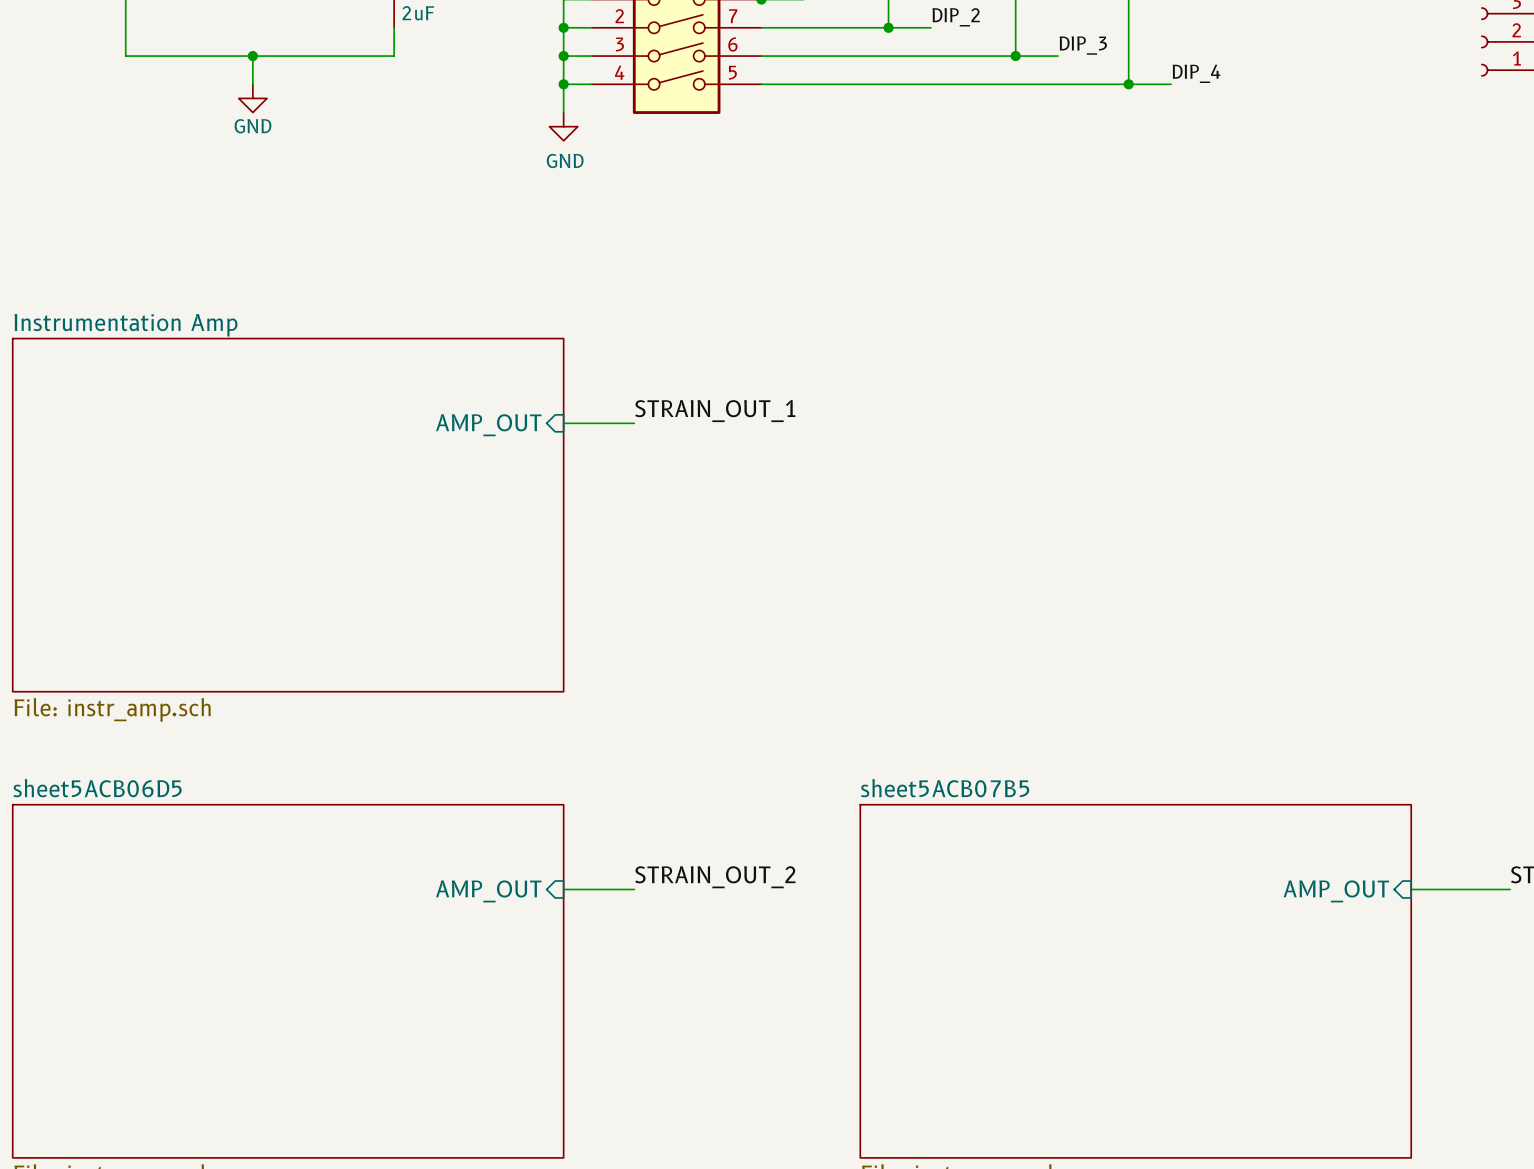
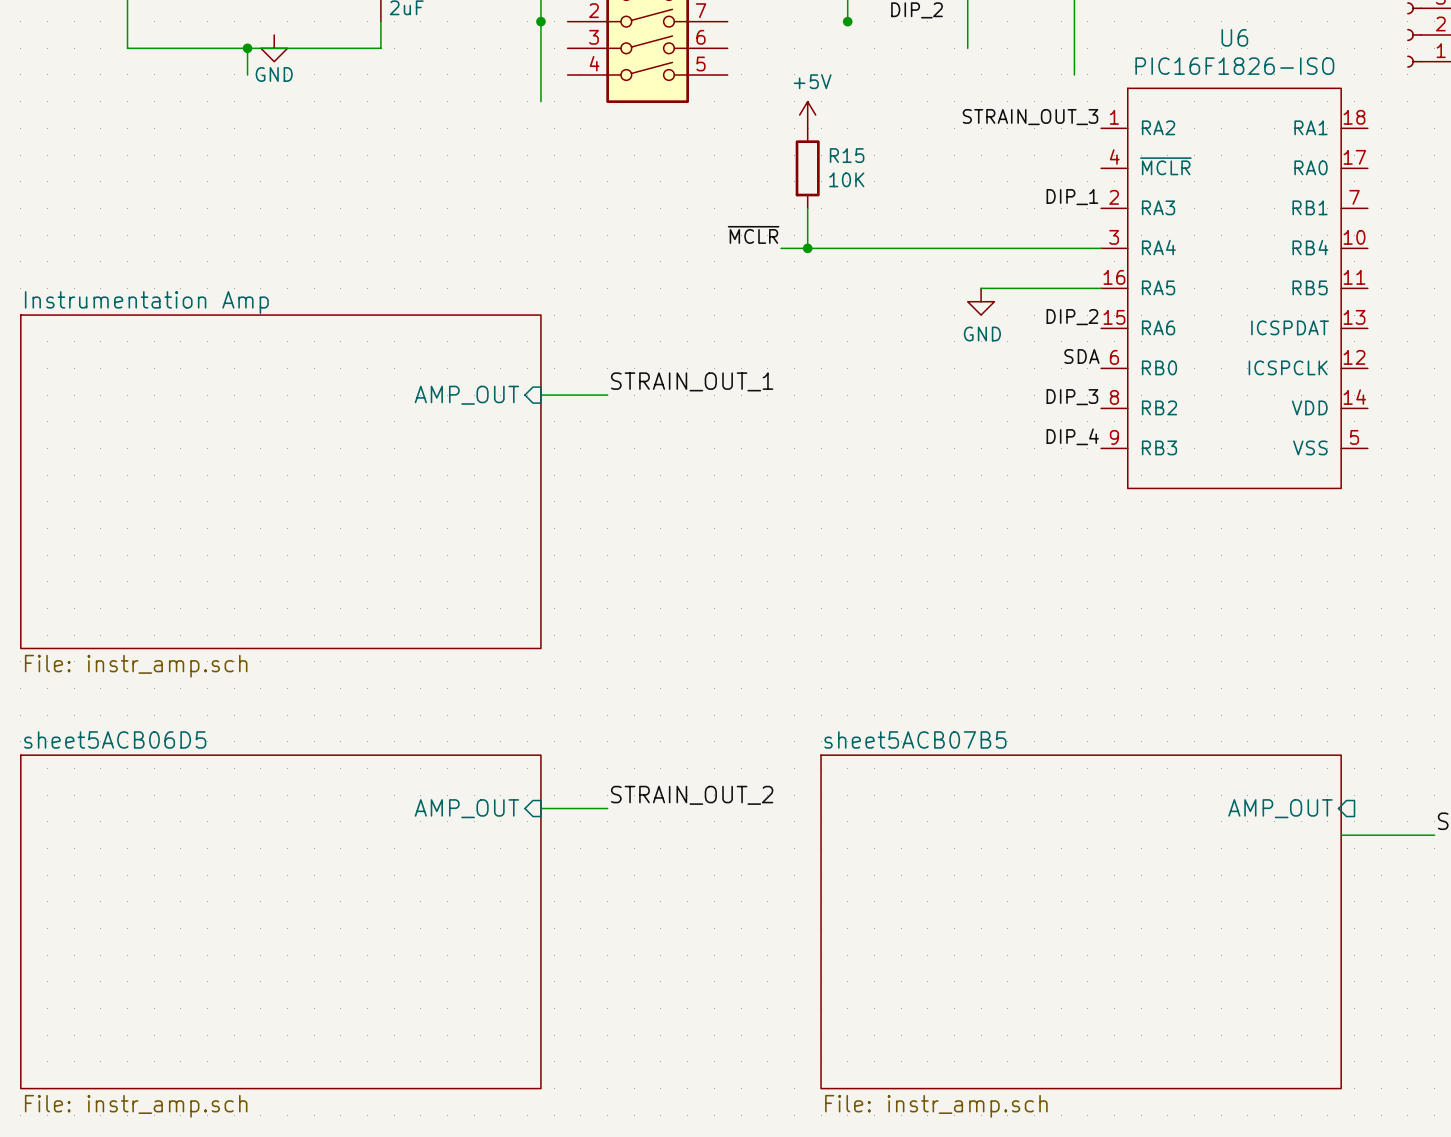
wire: (563, 27) (591, 27) -> none
wire: (761, 27) (930, 27) -> none
label: DIP_3 (1083, 45) -> none
wire: (563, 56) (591, 56) -> none
junction: (563, 56) -> none
wire: (761, 56) (1058, 56) -> none
junction: (1015, 56) -> none
label: DIP_4 (1196, 73) -> none
wire: (563, 84) (591, 84) -> none
junction: (563, 84) -> none
wire: (761, 84) (1171, 84) -> none
junction: (1128, 84) -> none
power symbol position: GND (252, 98) -> GND (274, 48)
power symbol: GND (563, 126) -> none
power symbol: none -> +5V (807, 115)
label: none -> STRAIN_OUT_3 (1030, 117)
R15: none -> 10K (807, 168)
label: none -> DIP_1 (1072, 197)
wire: none -> (807, 208) (807, 248)
label: none -> ~{MCLR} (753, 234)
wire: none -> (781, 248) (1101, 248)
junction: none -> (807, 248)
wire: none -> (981, 288) (1101, 288)
U6: none -> PIC16F1826-ISO (1234, 288)
power symbol: none -> GND (981, 301)
label: none -> DIP_2 (1072, 317)
label: none -> SDA (1081, 356)
label: none -> DIP_3 (1072, 397)
label: none -> DIP_4 (1072, 436)
label position: STRAIN_OUT_2 (715, 877) -> STRAIN_OUT_2 (692, 795)
wire: (563, 889) (634, 889) -> (540, 808) (607, 808)
sheet pin position: AMP_OUT (488, 891) -> AMP_OUT (466, 808)
sheet pin position: AMP_OUT (1336, 891) -> AMP_OUT (1280, 808)

